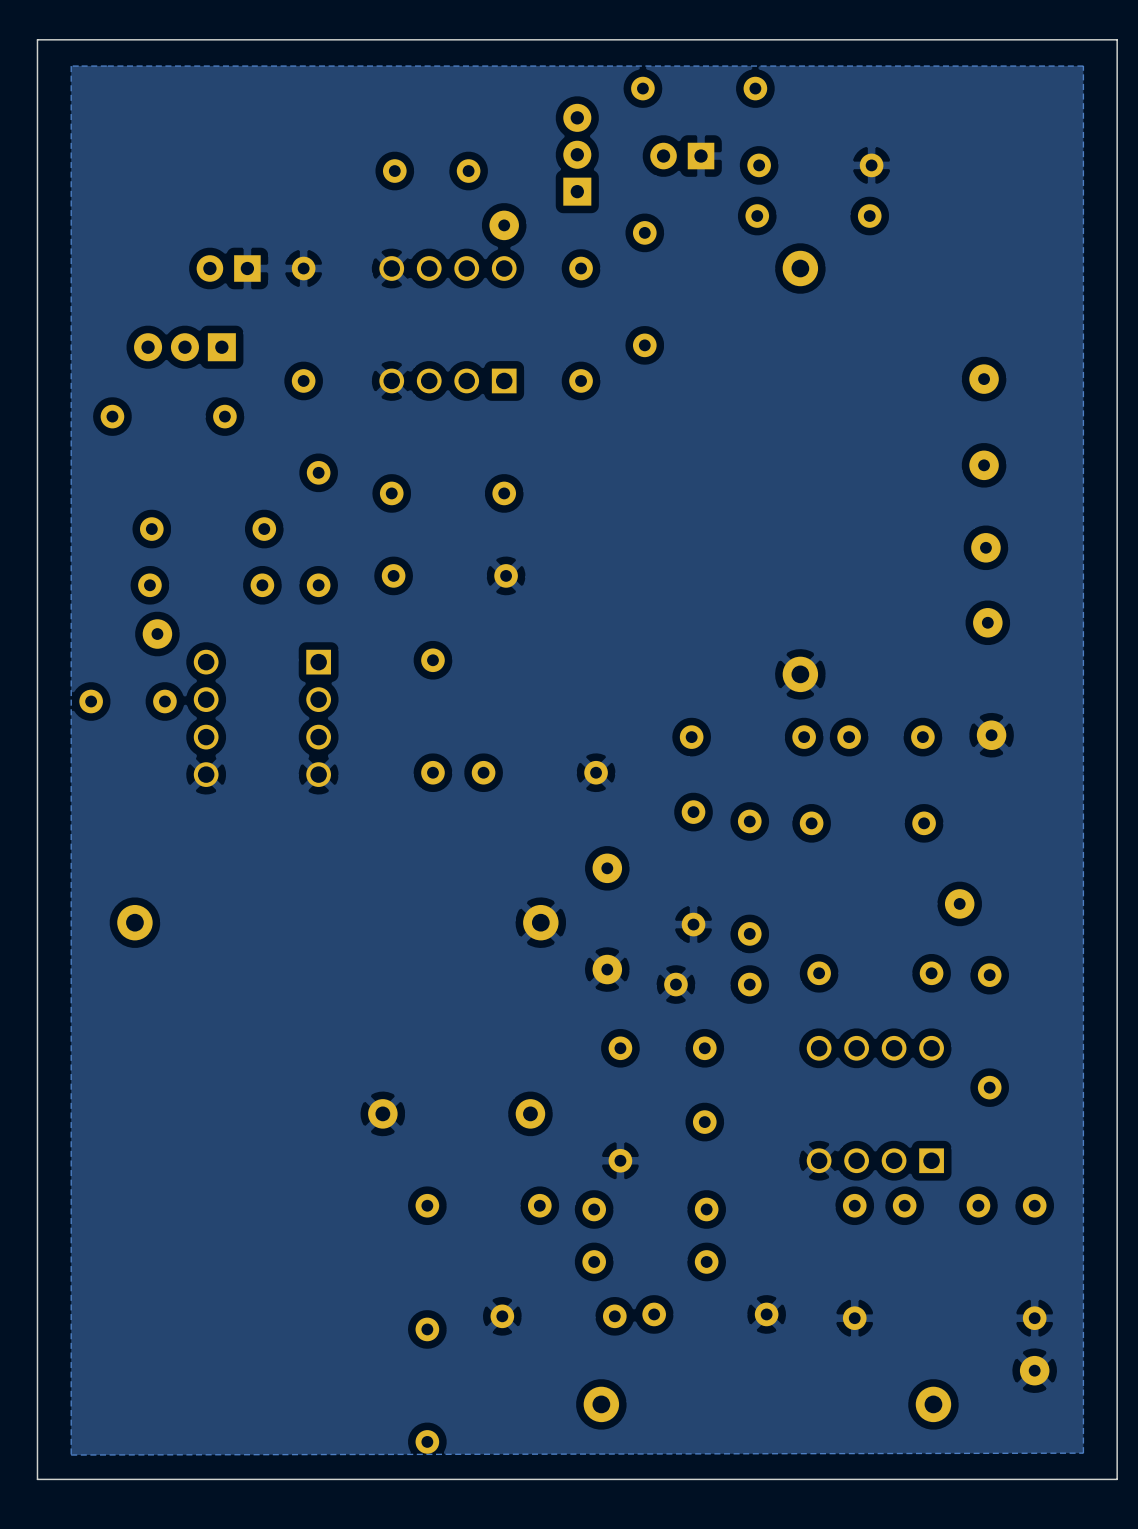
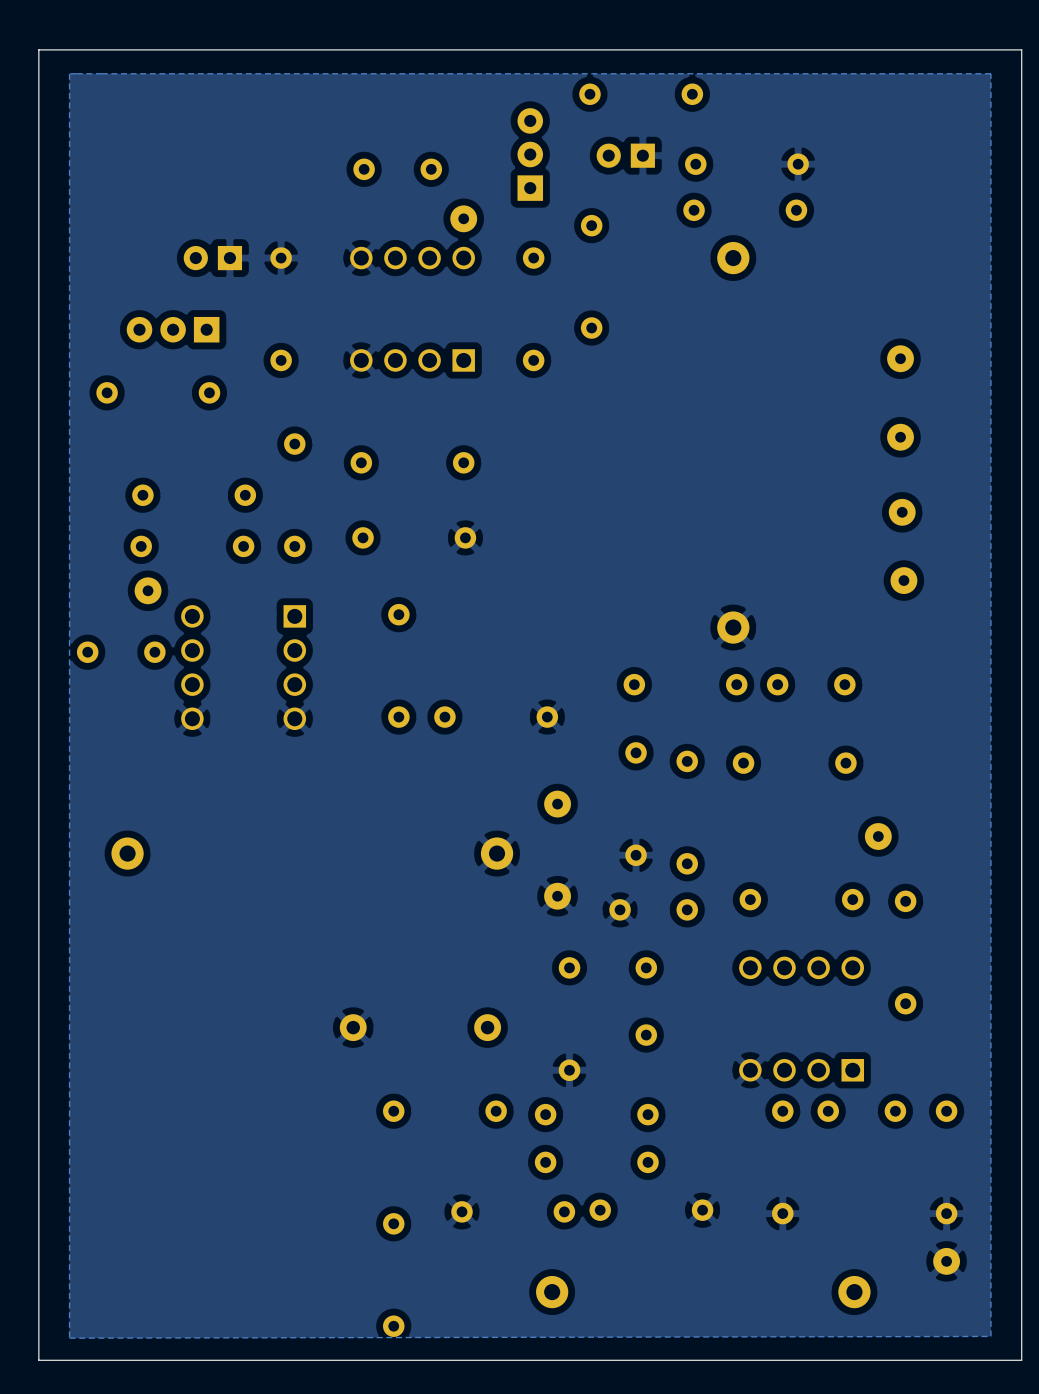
part: (991, 735) -> none

